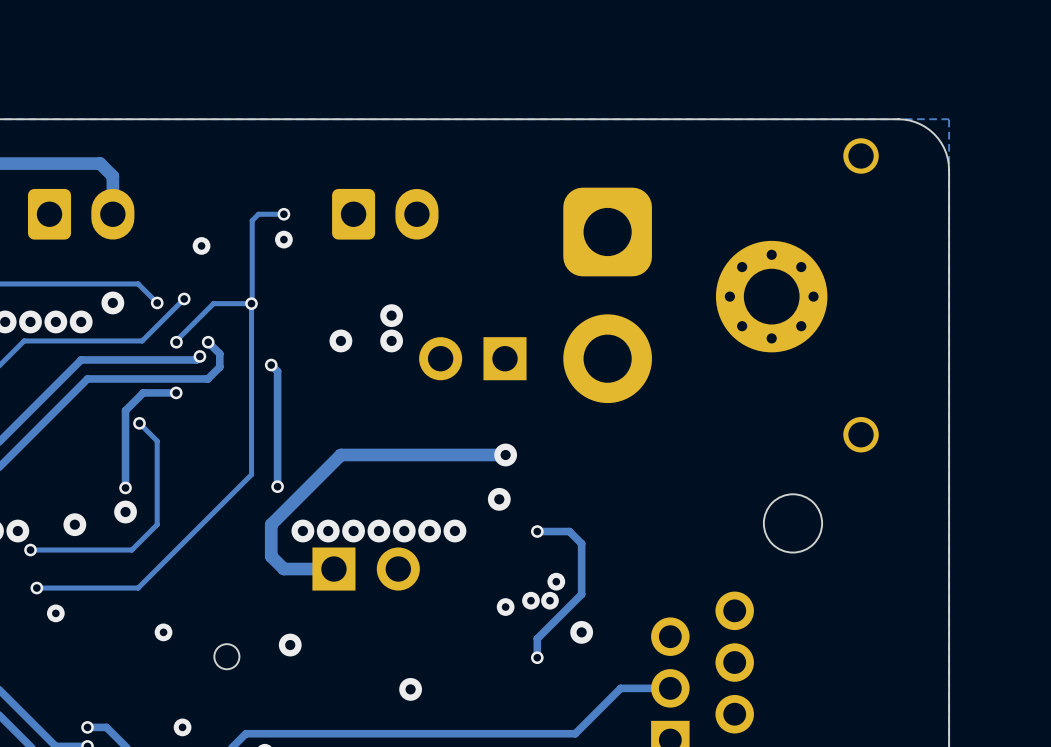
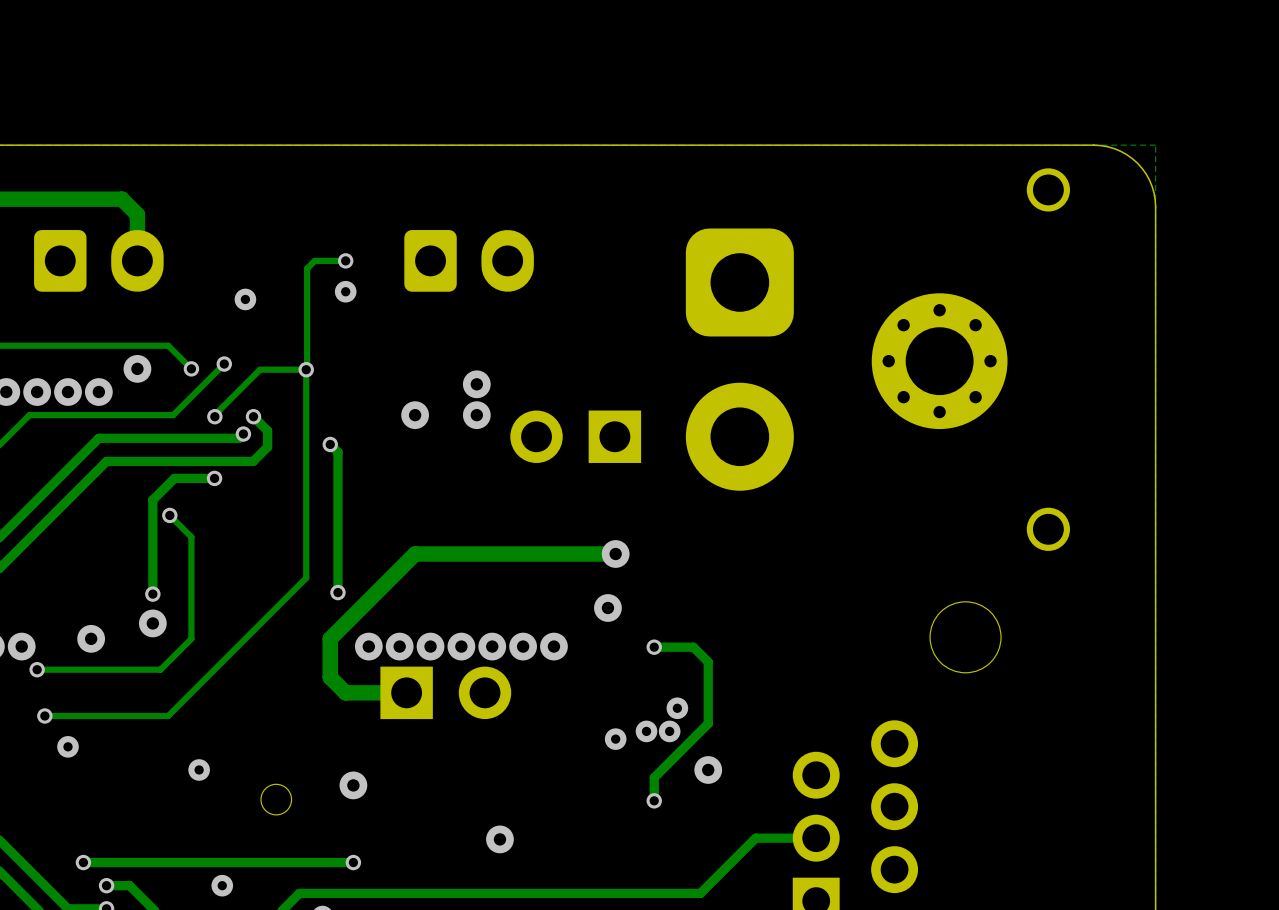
via: none -> (83, 862)
track: none -> (353, 862) (83, 862)
via: none -> (353, 862)

